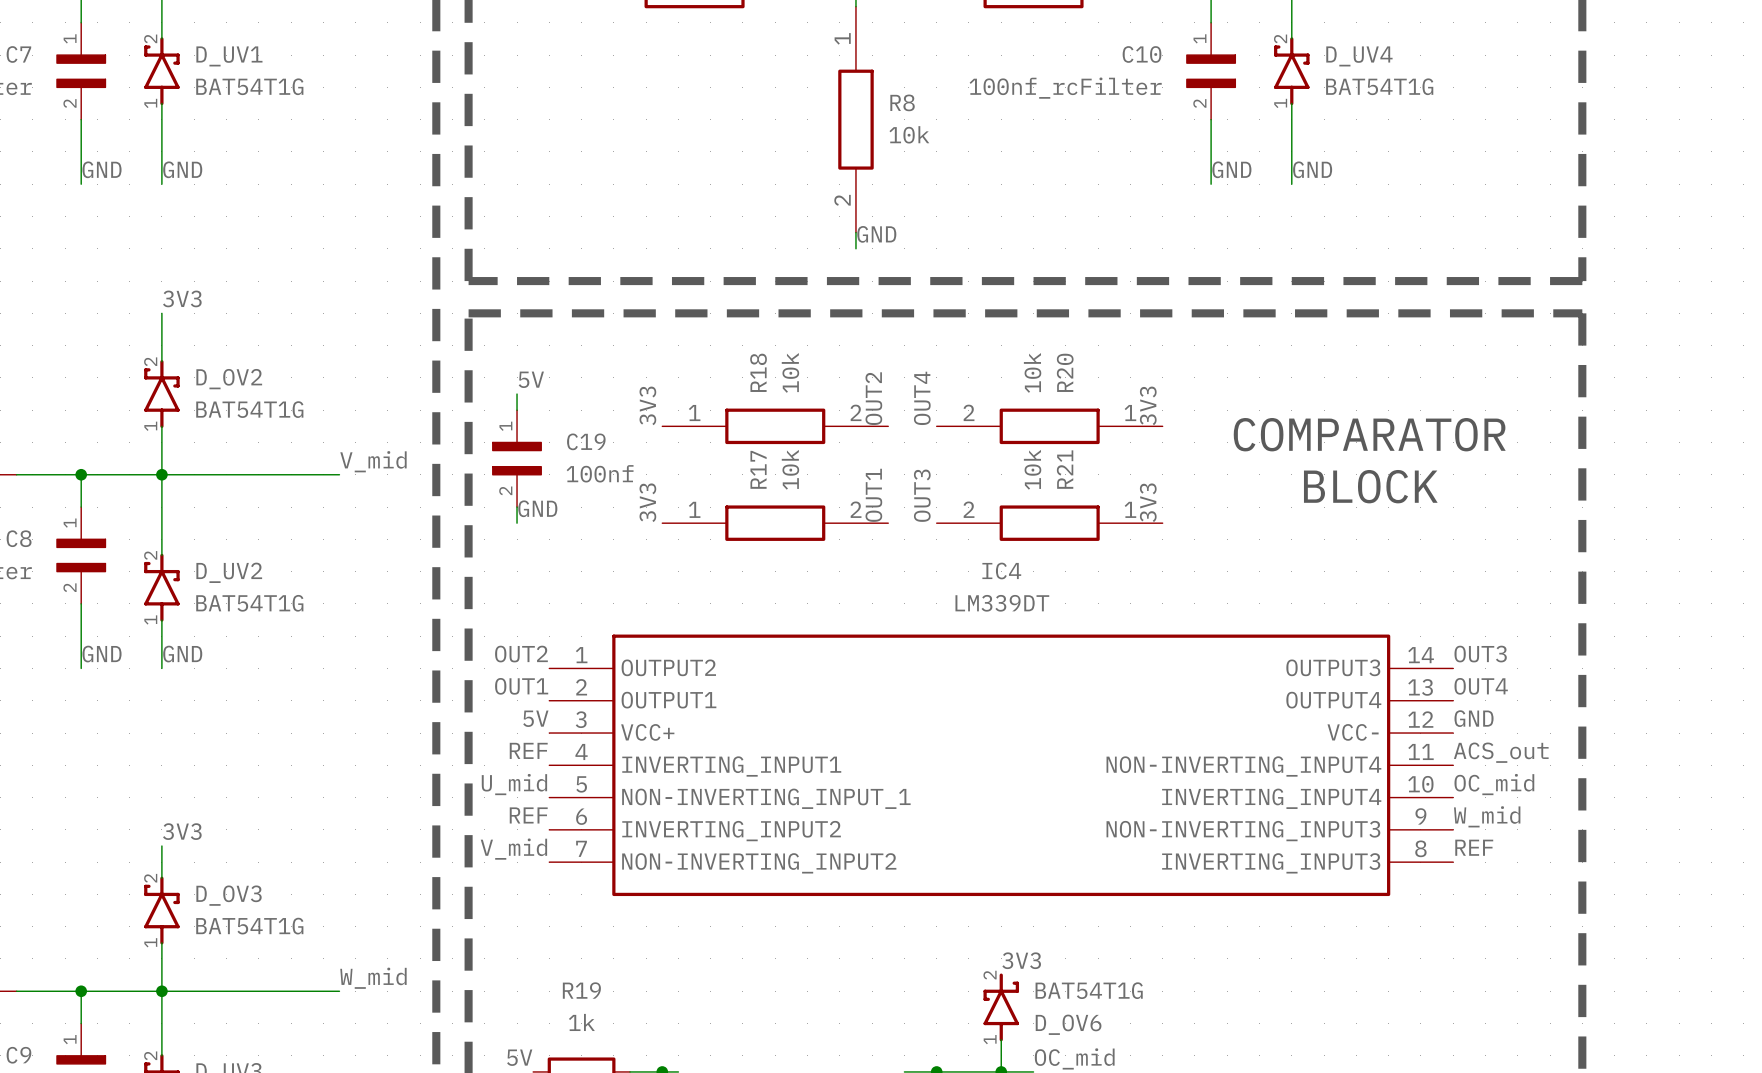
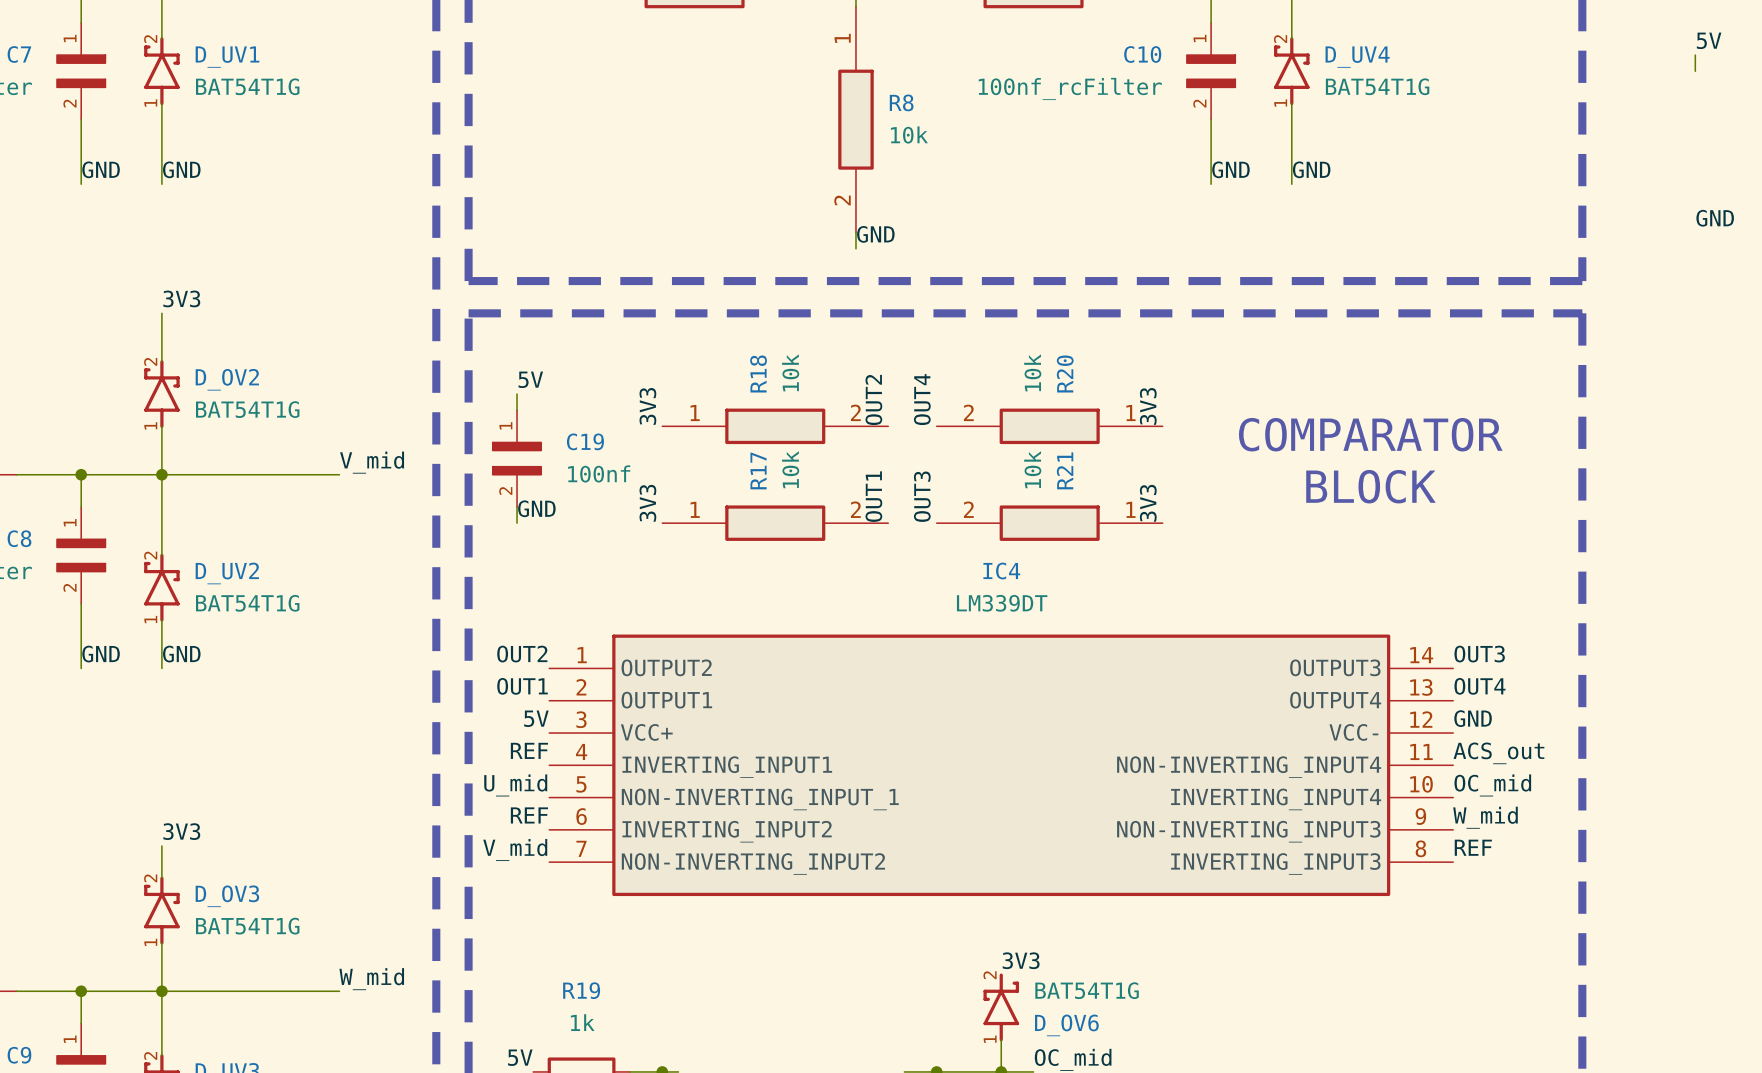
label: none -> 5V (1709, 40)
wire: none -> (1695, 55) (1695, 71)
label: none -> GND (1715, 218)

